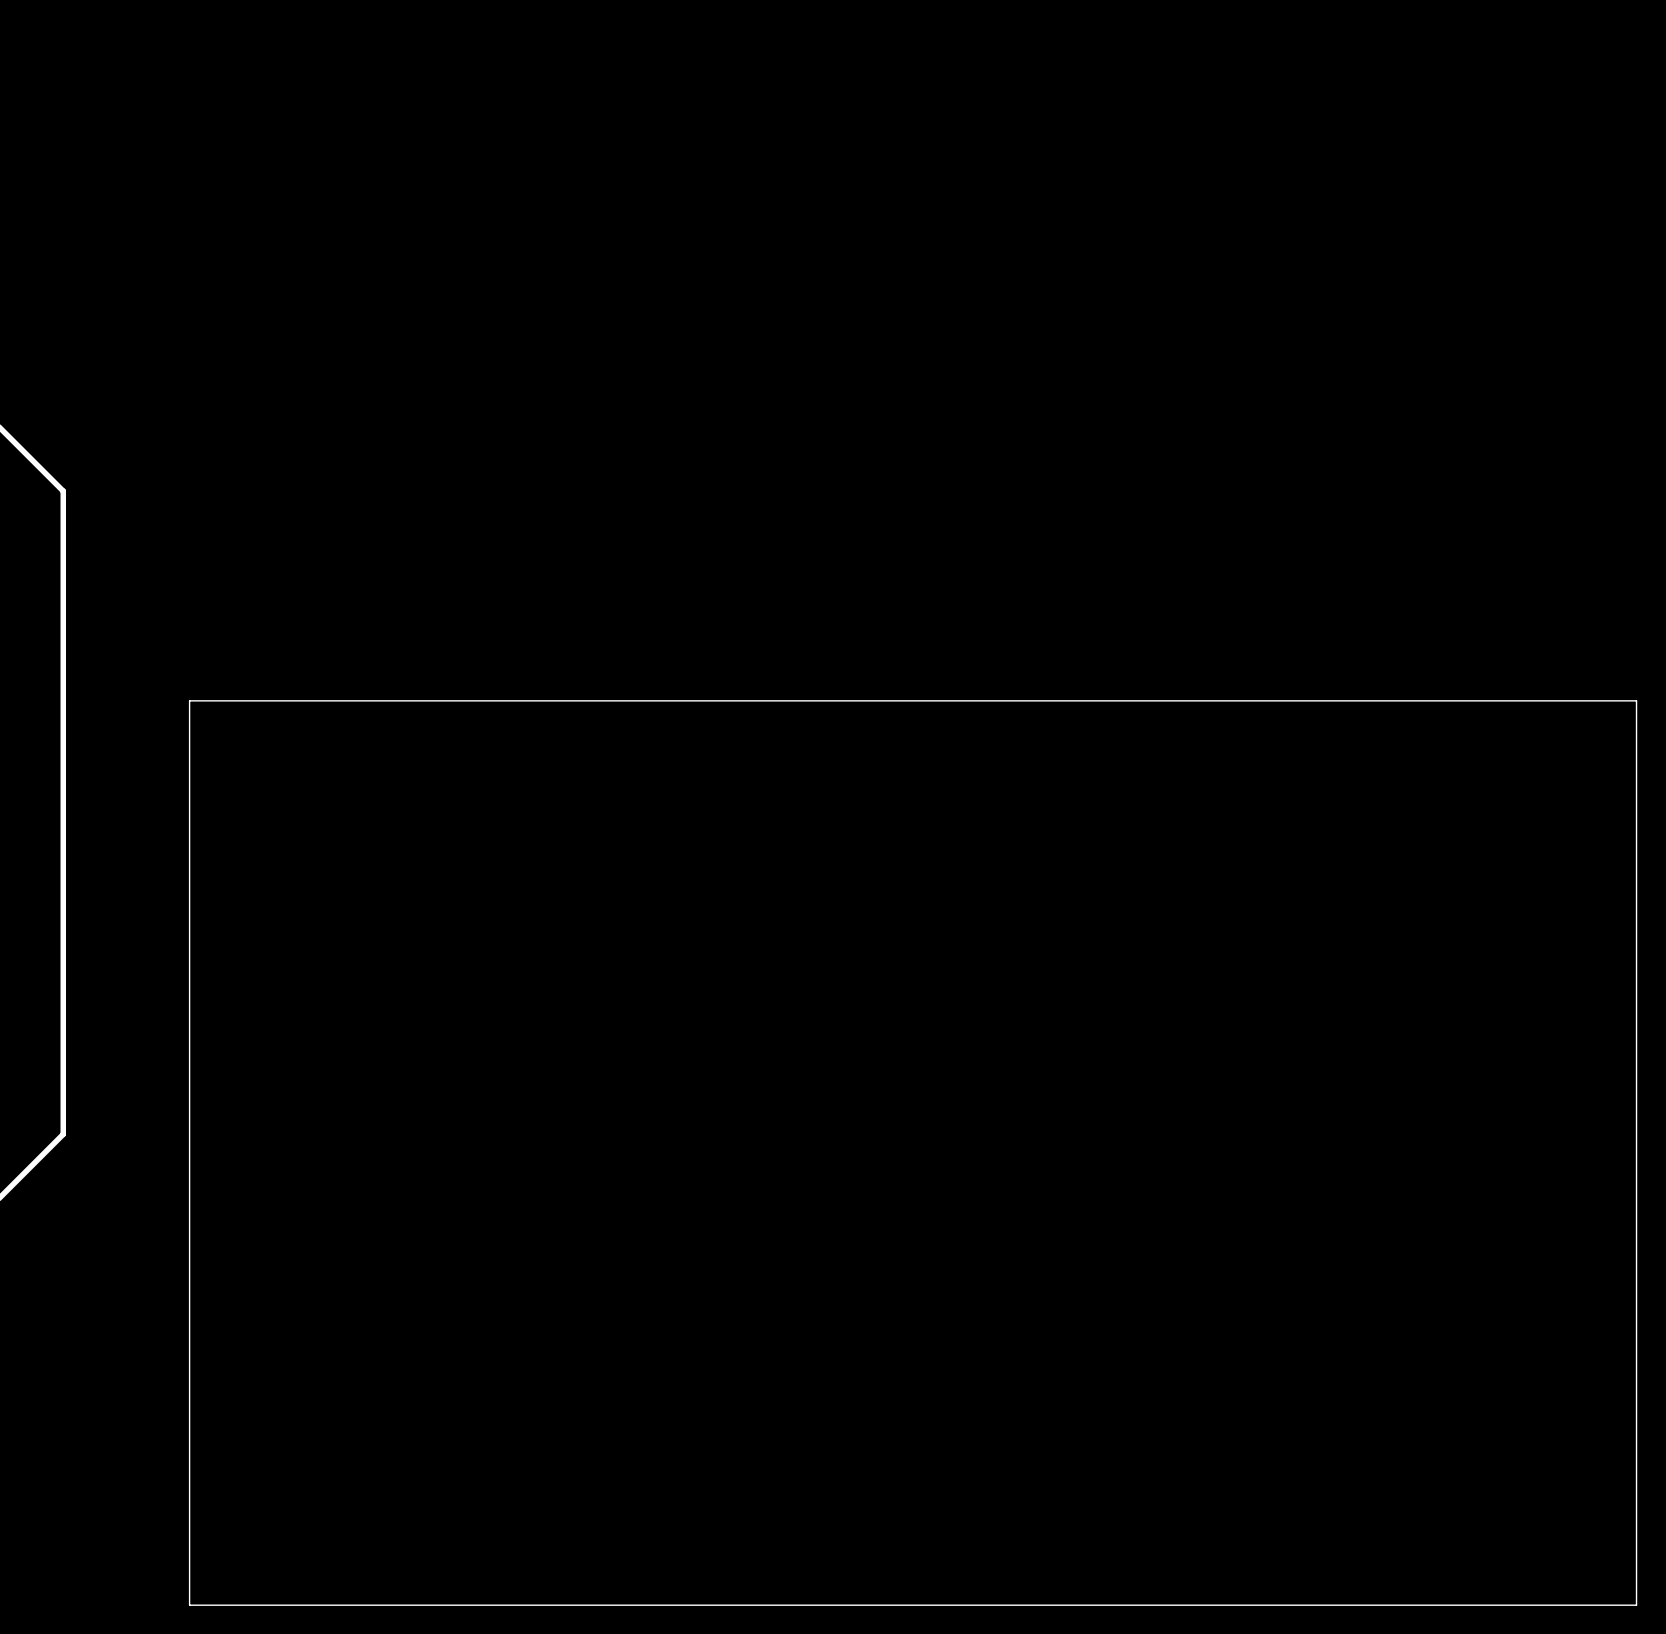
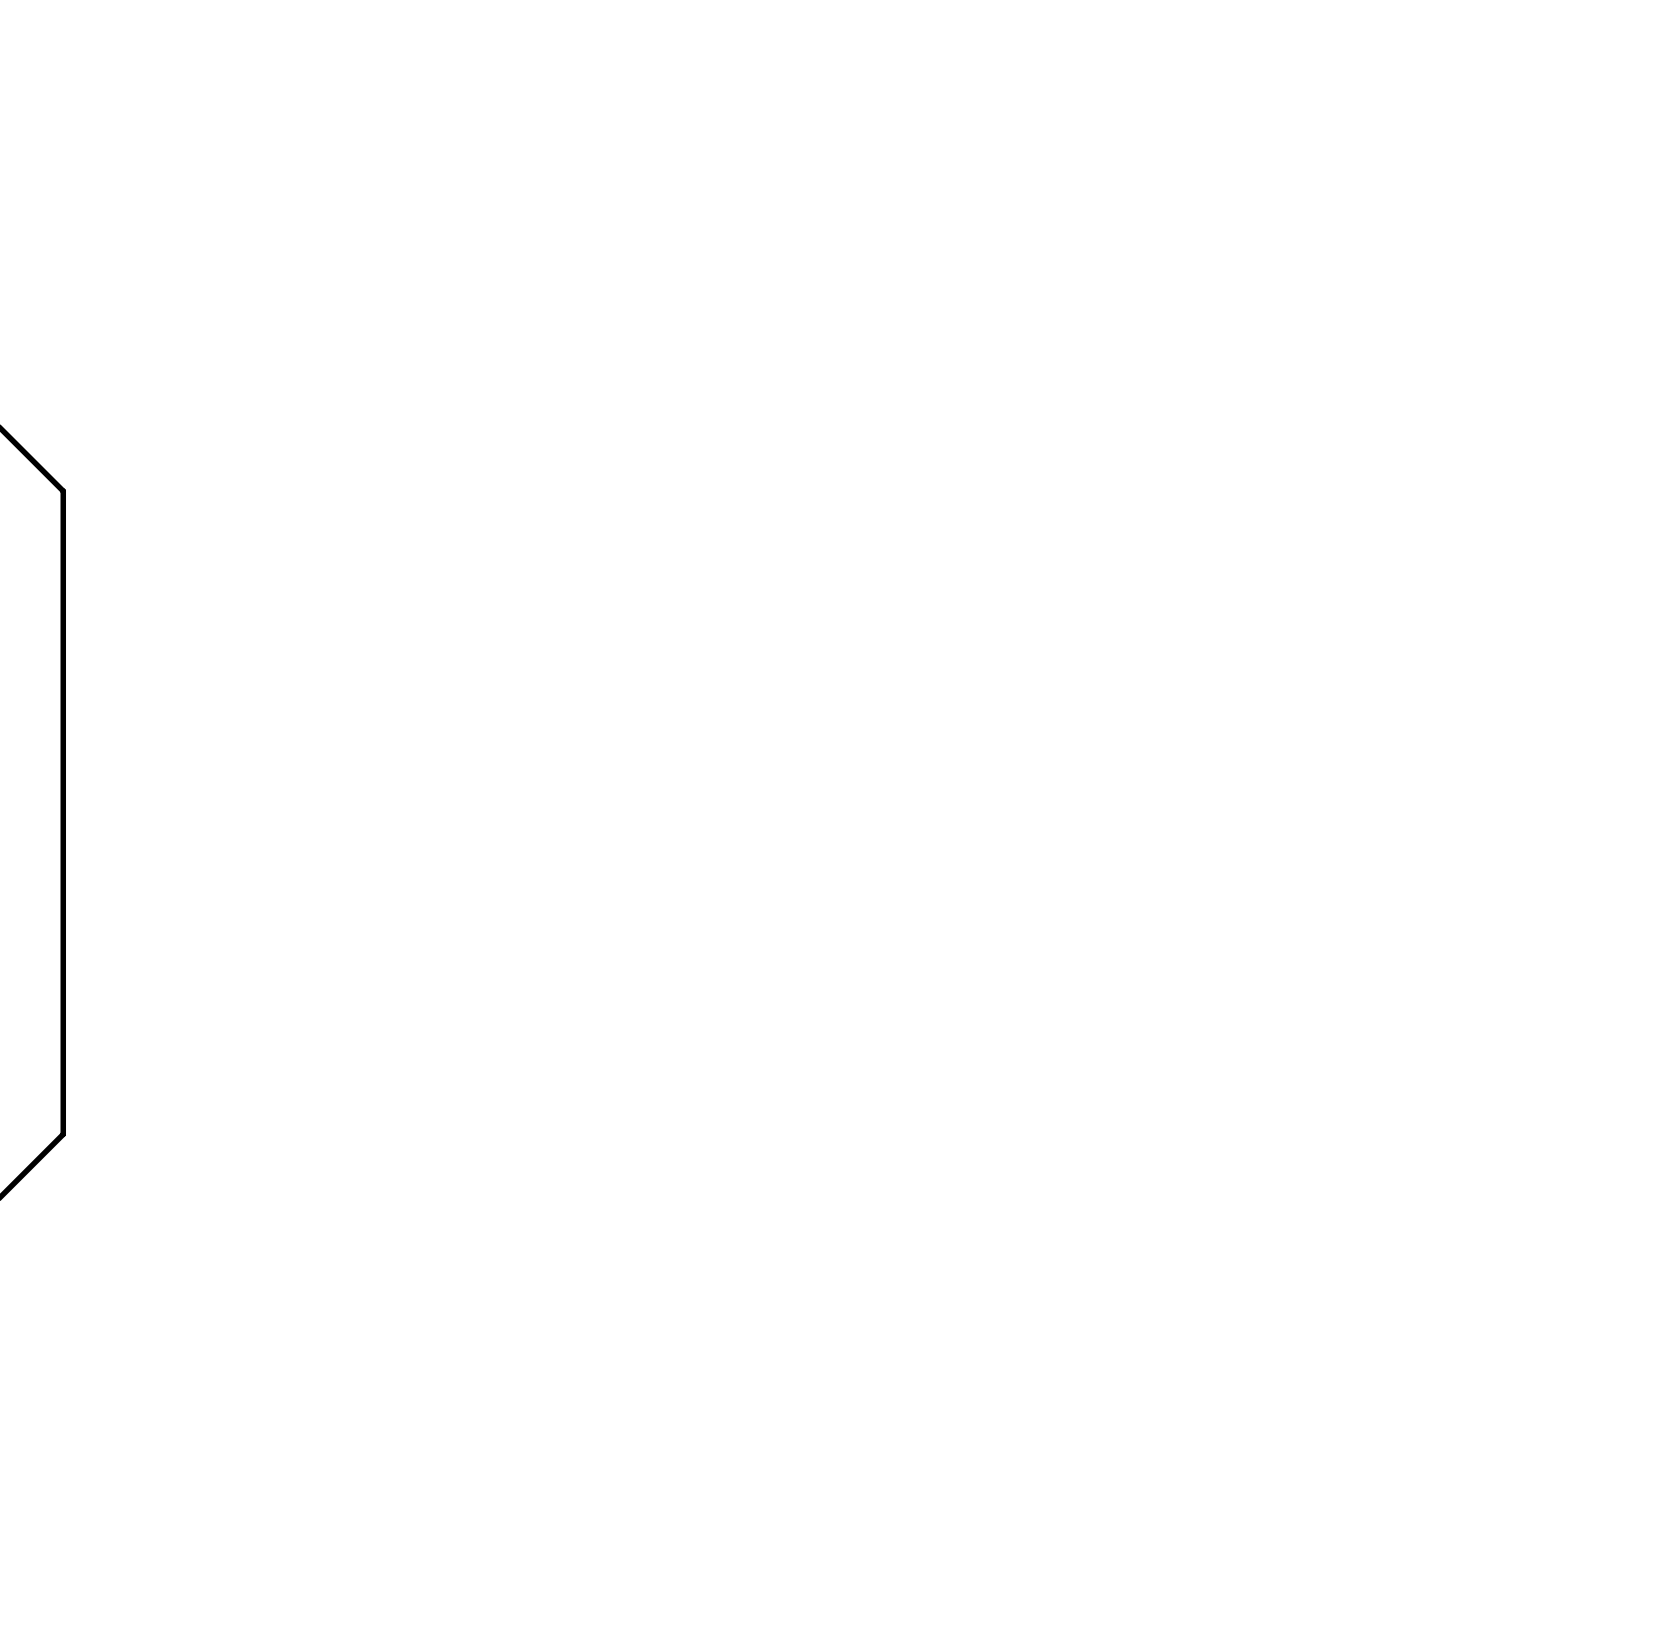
board edge: (189, 700) (1636, 700) (1636, 1605) (189, 1605) (189, 700) -> none

